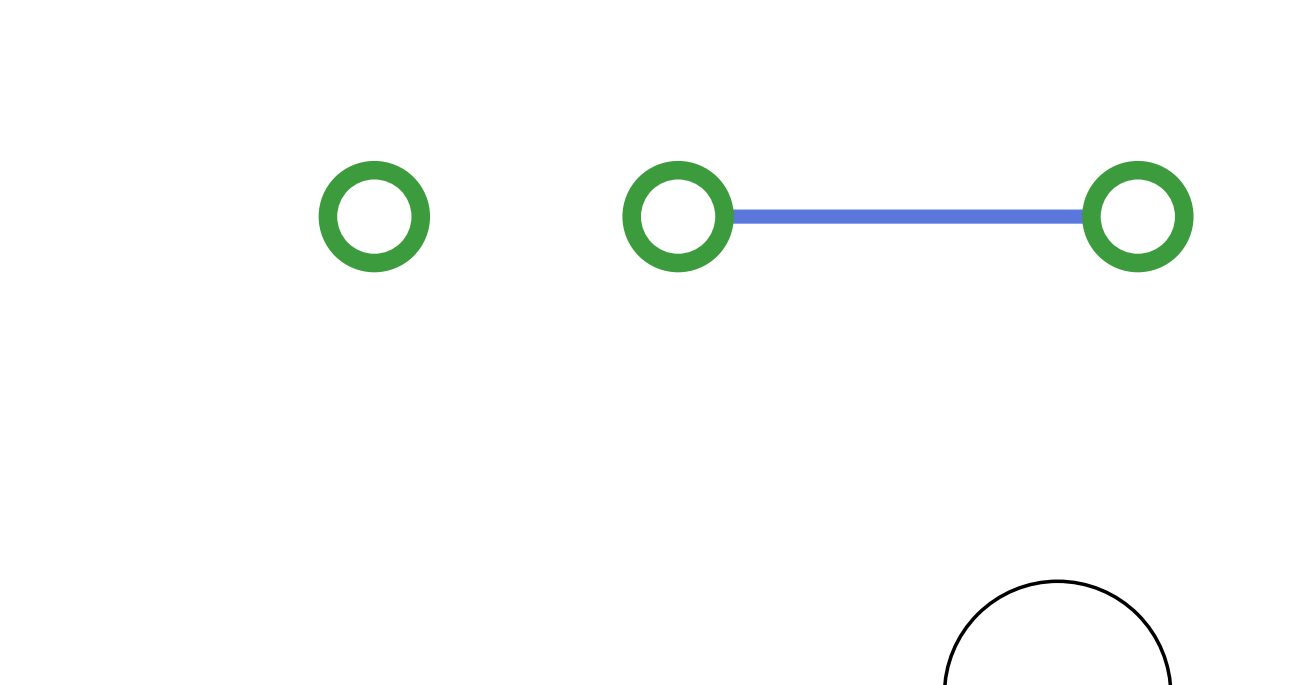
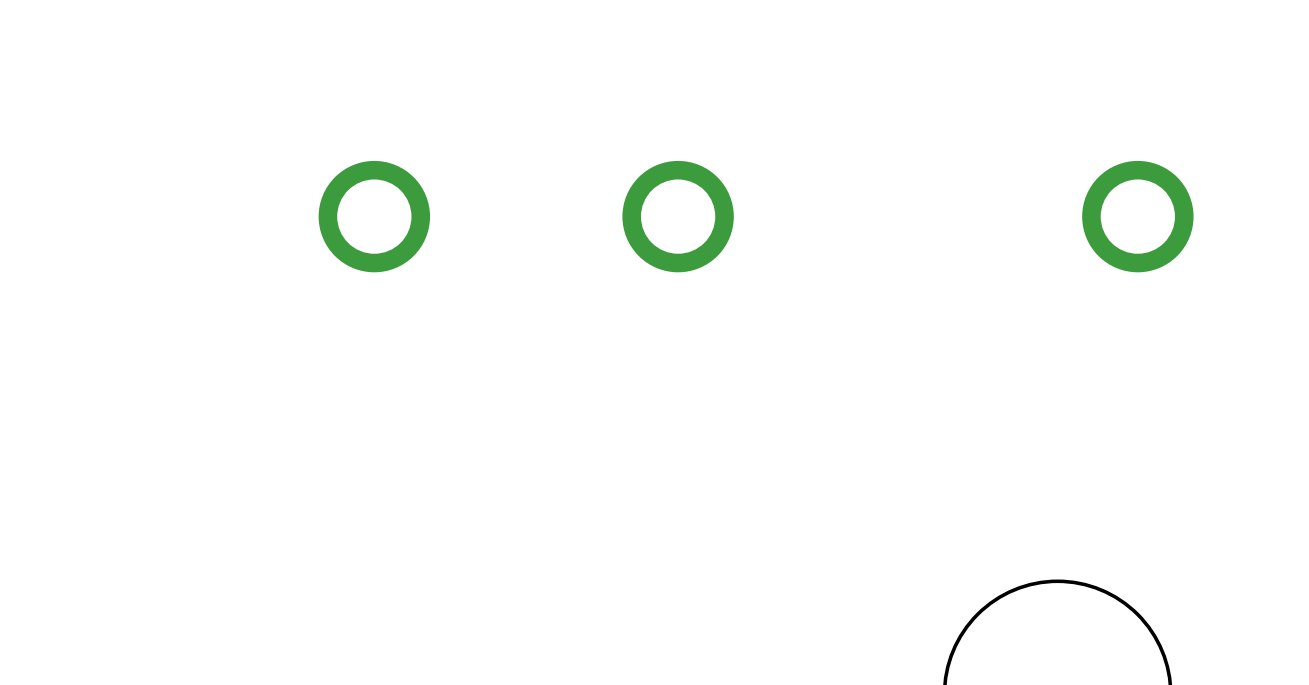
track: (1137, 216) (678, 216) -> none

